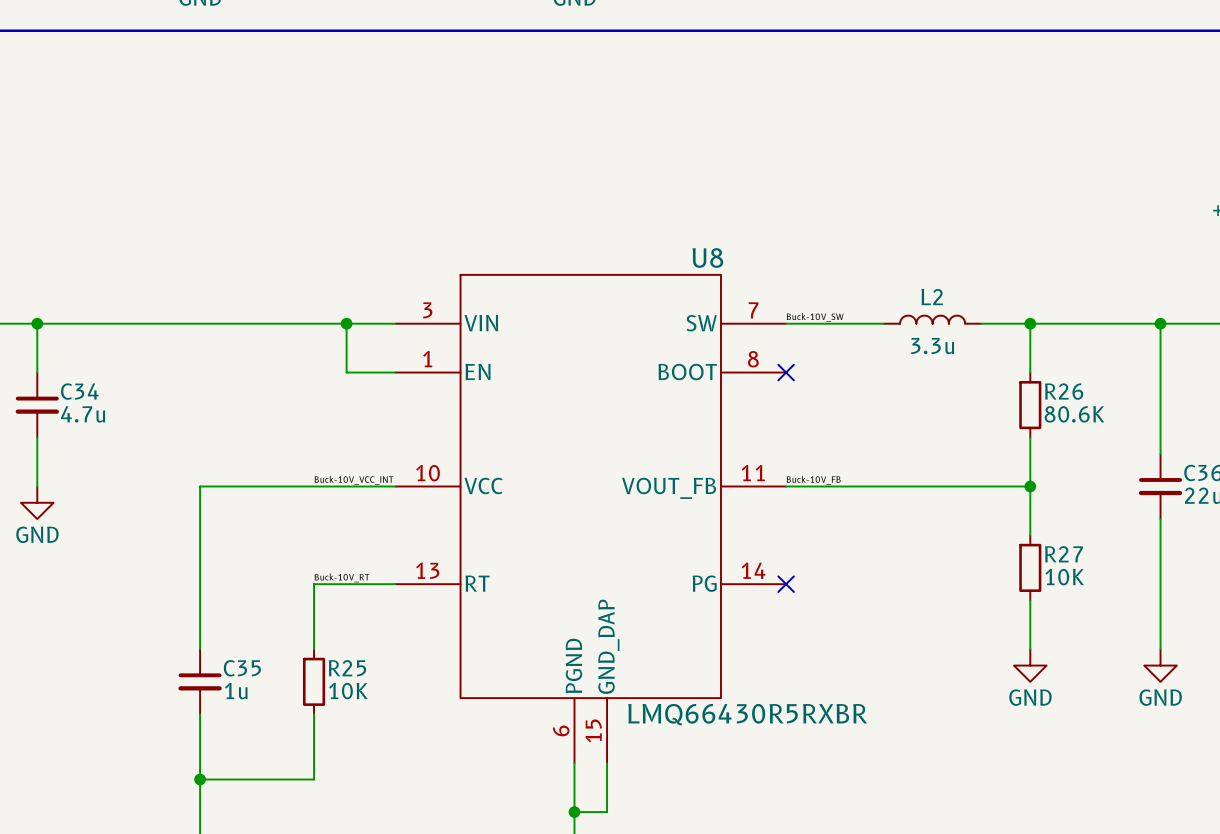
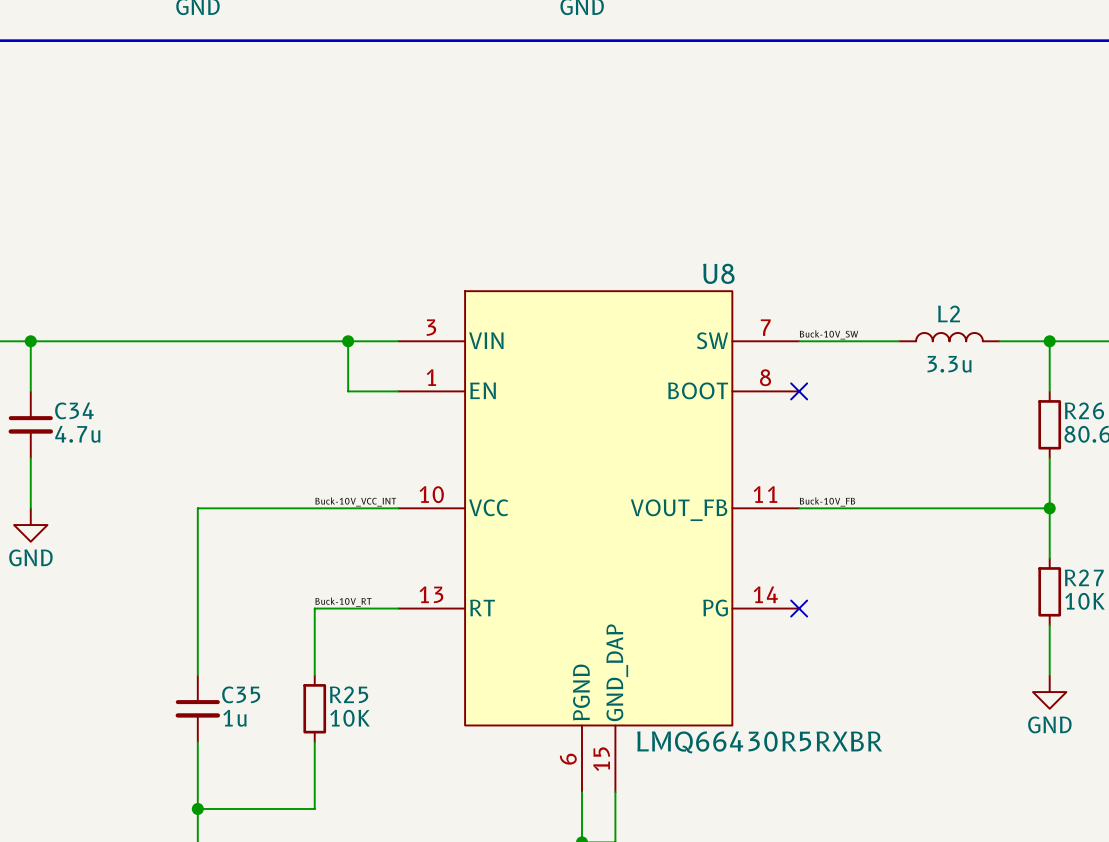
U8 symbol: [395, 274, 787, 764] -> [398, 291, 800, 793]

